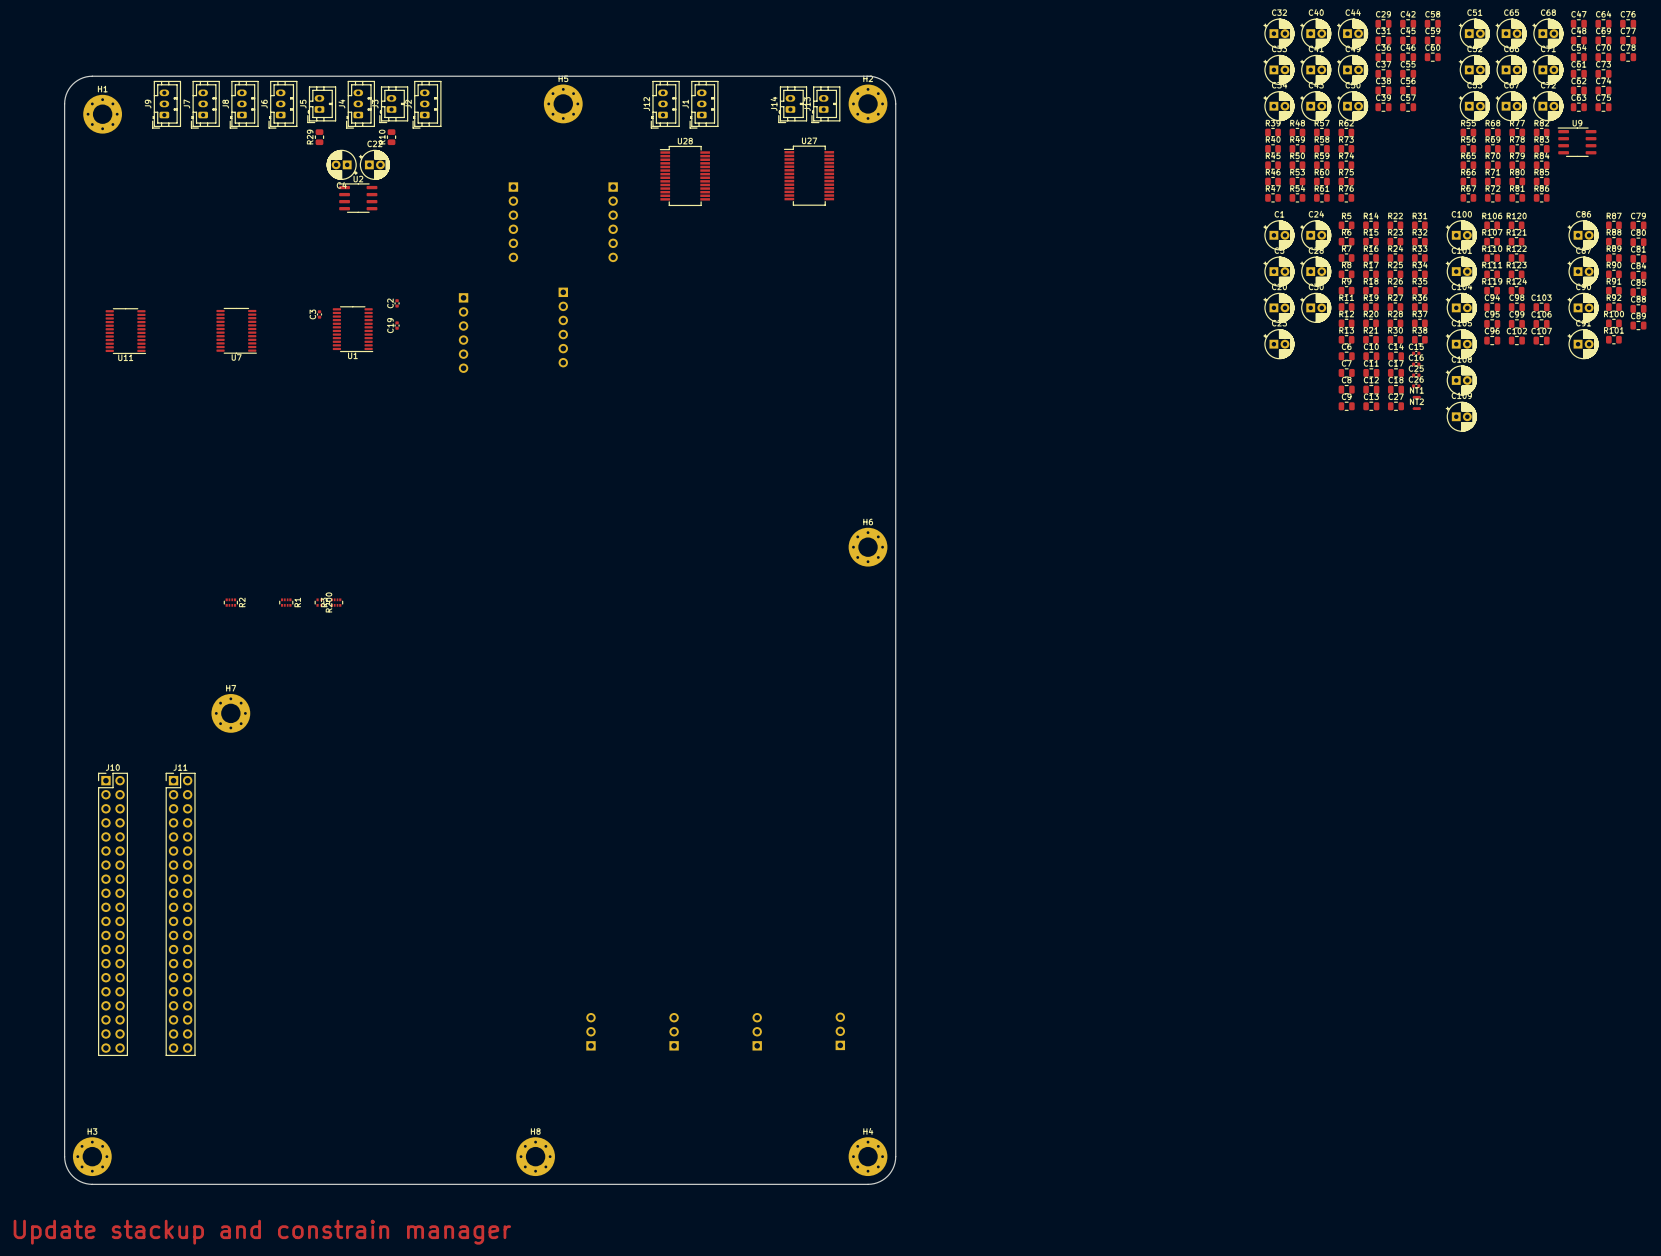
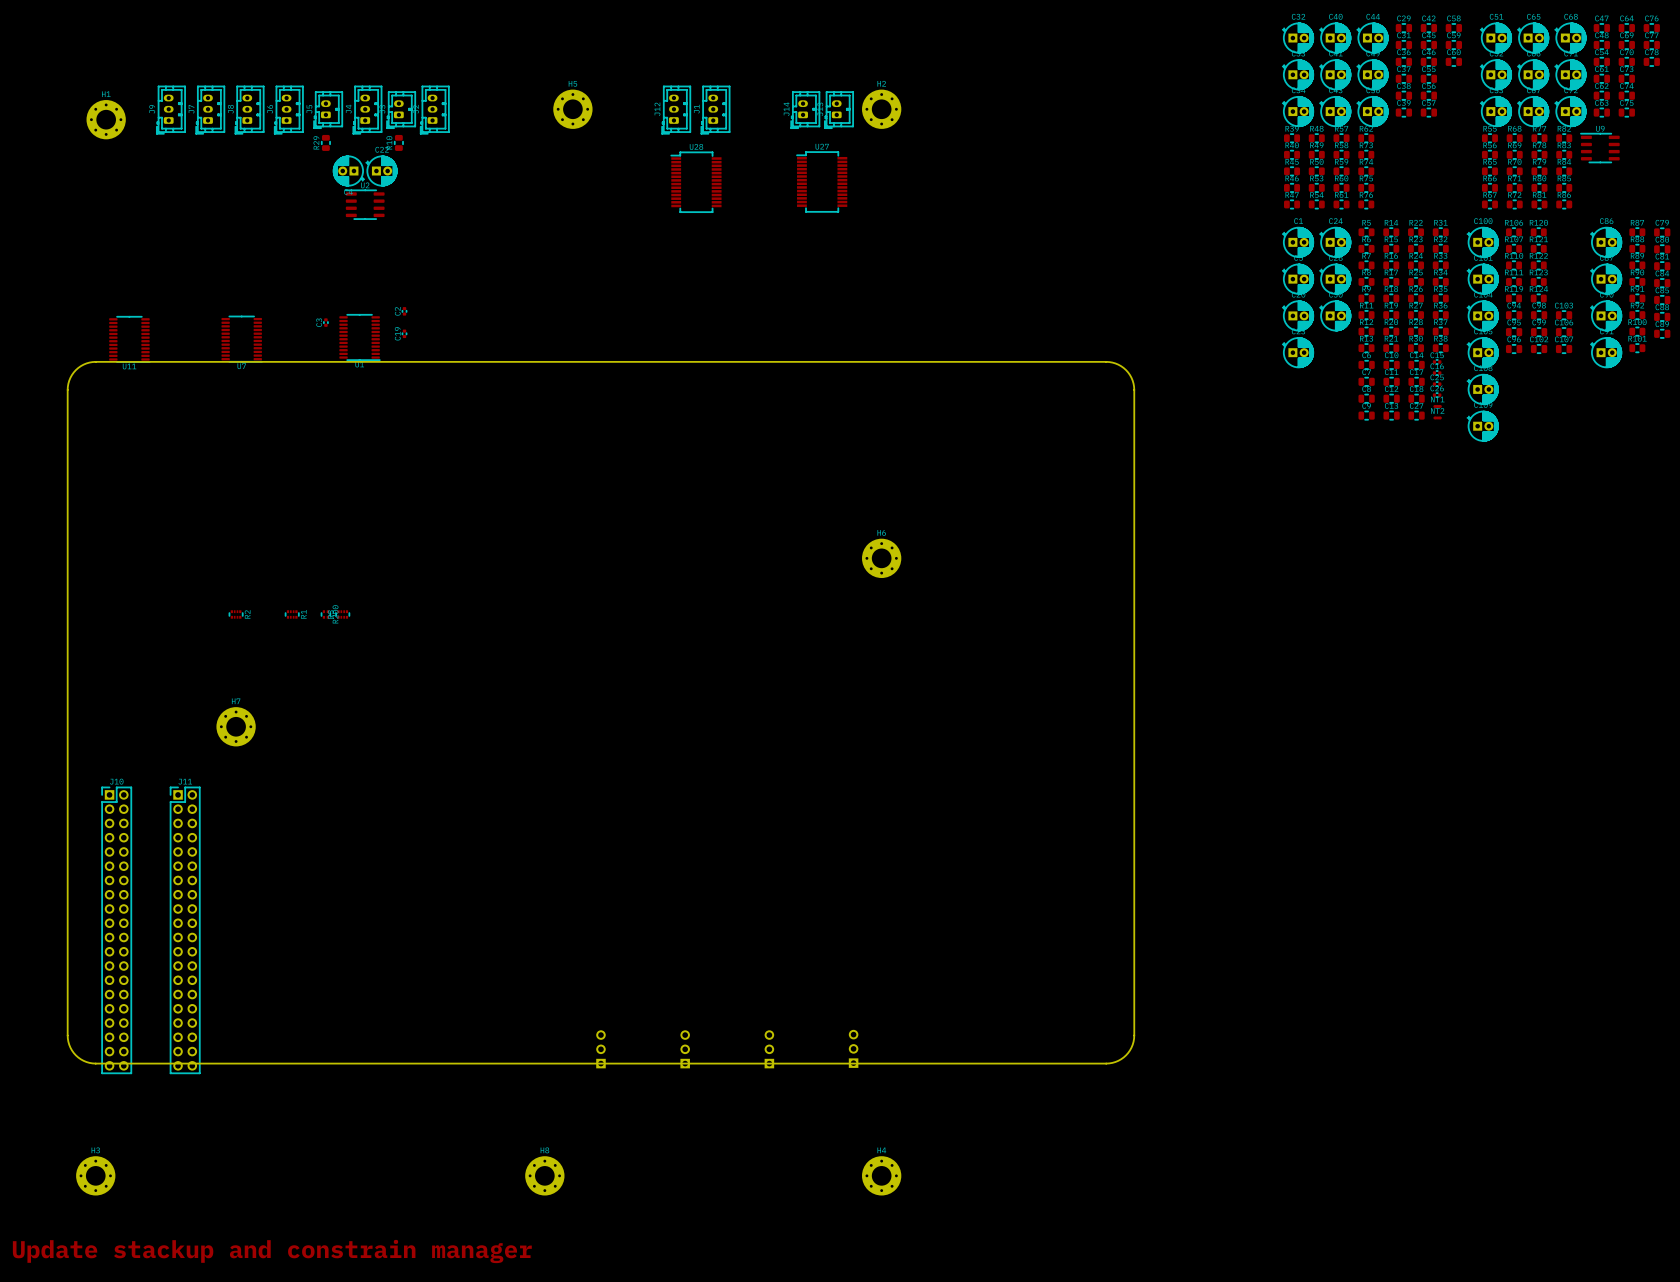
part: (513, 222) -> none
part: (613, 222) -> none
part: (563, 327) -> none
part: (463, 333) -> none
board edge: (64, 380) (64, 100) (70, 86) (83, 77) (92, 76) (868, 76) (882, 80) (889, 86) (894, 94) (895, 103) (895, 1156) (892, 1168) (887, 1176) (880, 1181) (868, 1184) (86, 1183) (72, 1176) (67, 1168) (64, 1159) (64, 1018) -> (67, 389) (70, 377) (75, 370) (86, 363) (95, 361) (1106, 361) (1115, 363) (1126, 370) (1131, 377) (1134, 389) (1134, 1035) (1129, 1050) (1121, 1059) (1106, 1063) (95, 1063) (86, 1062) (75, 1055) (70, 1047) (67, 1035)

